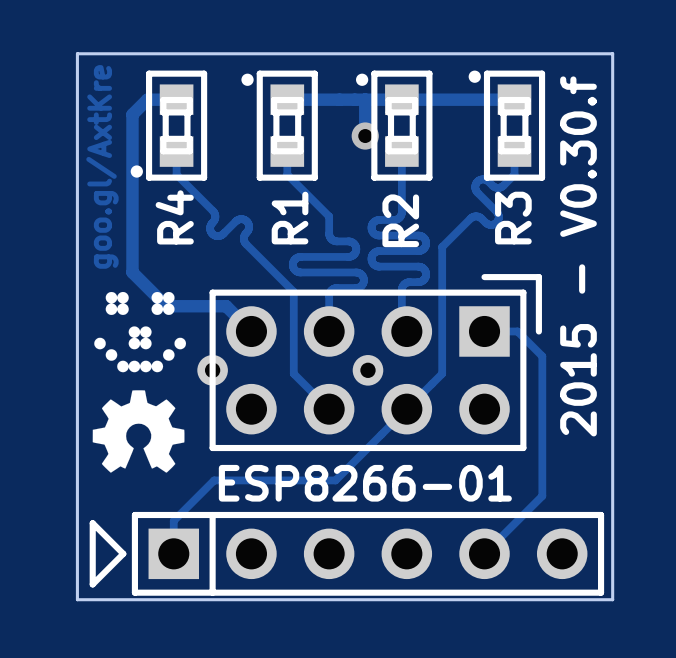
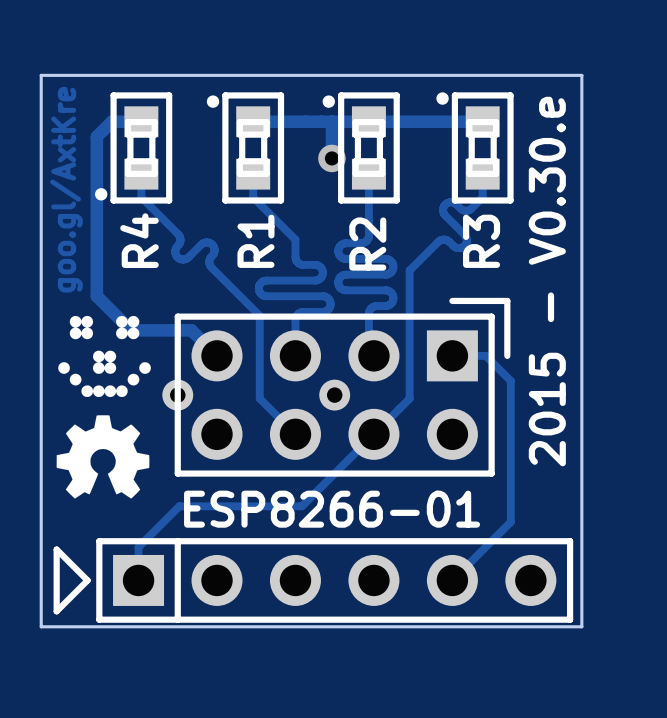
text: 2015 - V0.30.f (578, 256) -> 2015 - V0.30.e (547, 281)

